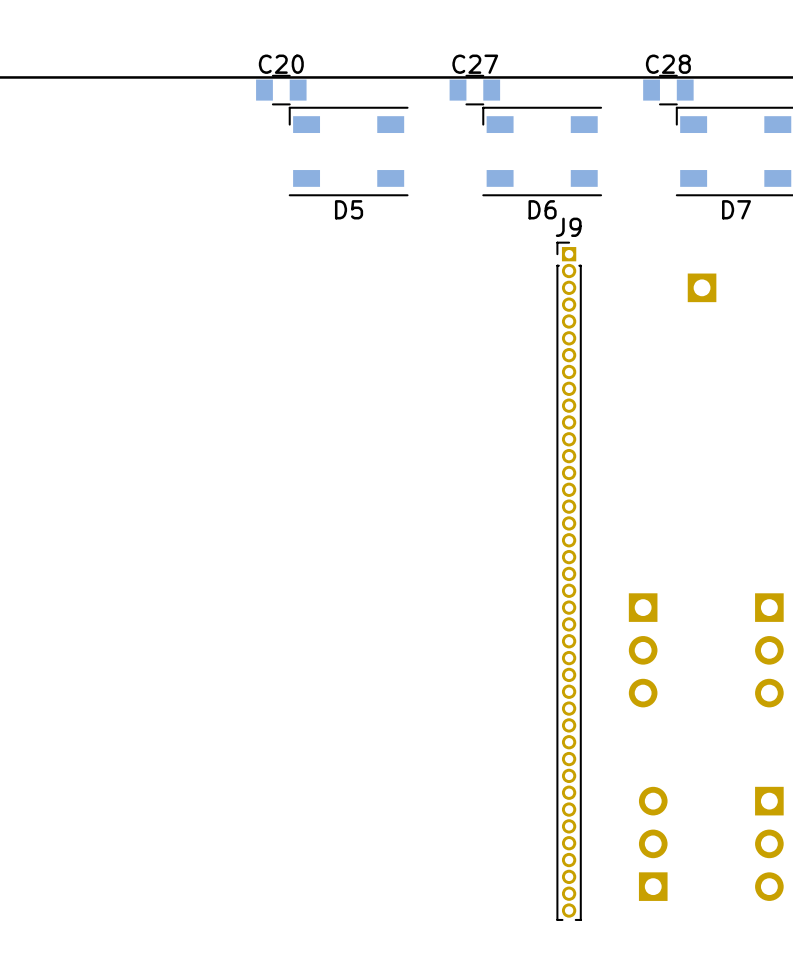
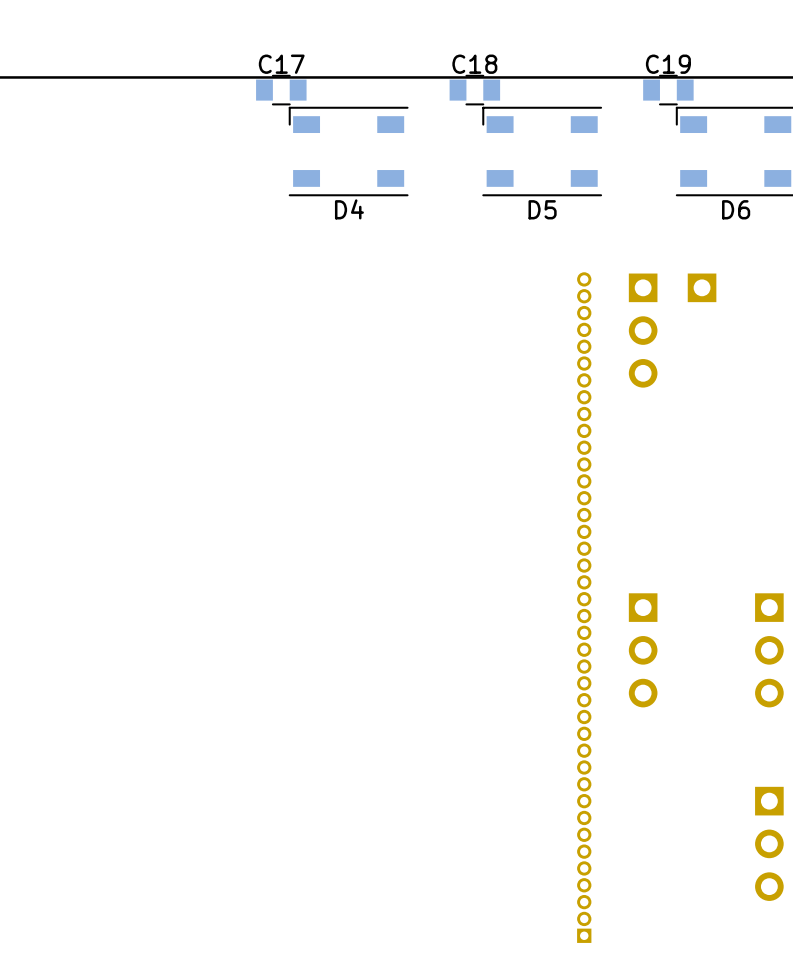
C20 name: C20 (281, 64) -> C17 (281, 64)
C27 name: C27 (475, 64) -> C18 (474, 64)
C28 name: C28 (668, 64) -> C19 (668, 64)
D5 name: D5 (349, 209) -> D4 (349, 209)
D6 name: D6 (542, 209) -> D5 (542, 209)
D7 name: D7 (736, 209) -> D6 (736, 209)
part: none -> (643, 330)
J9 side: bottom (569, 581) -> top (584, 607)
part: (653, 843) -> none

